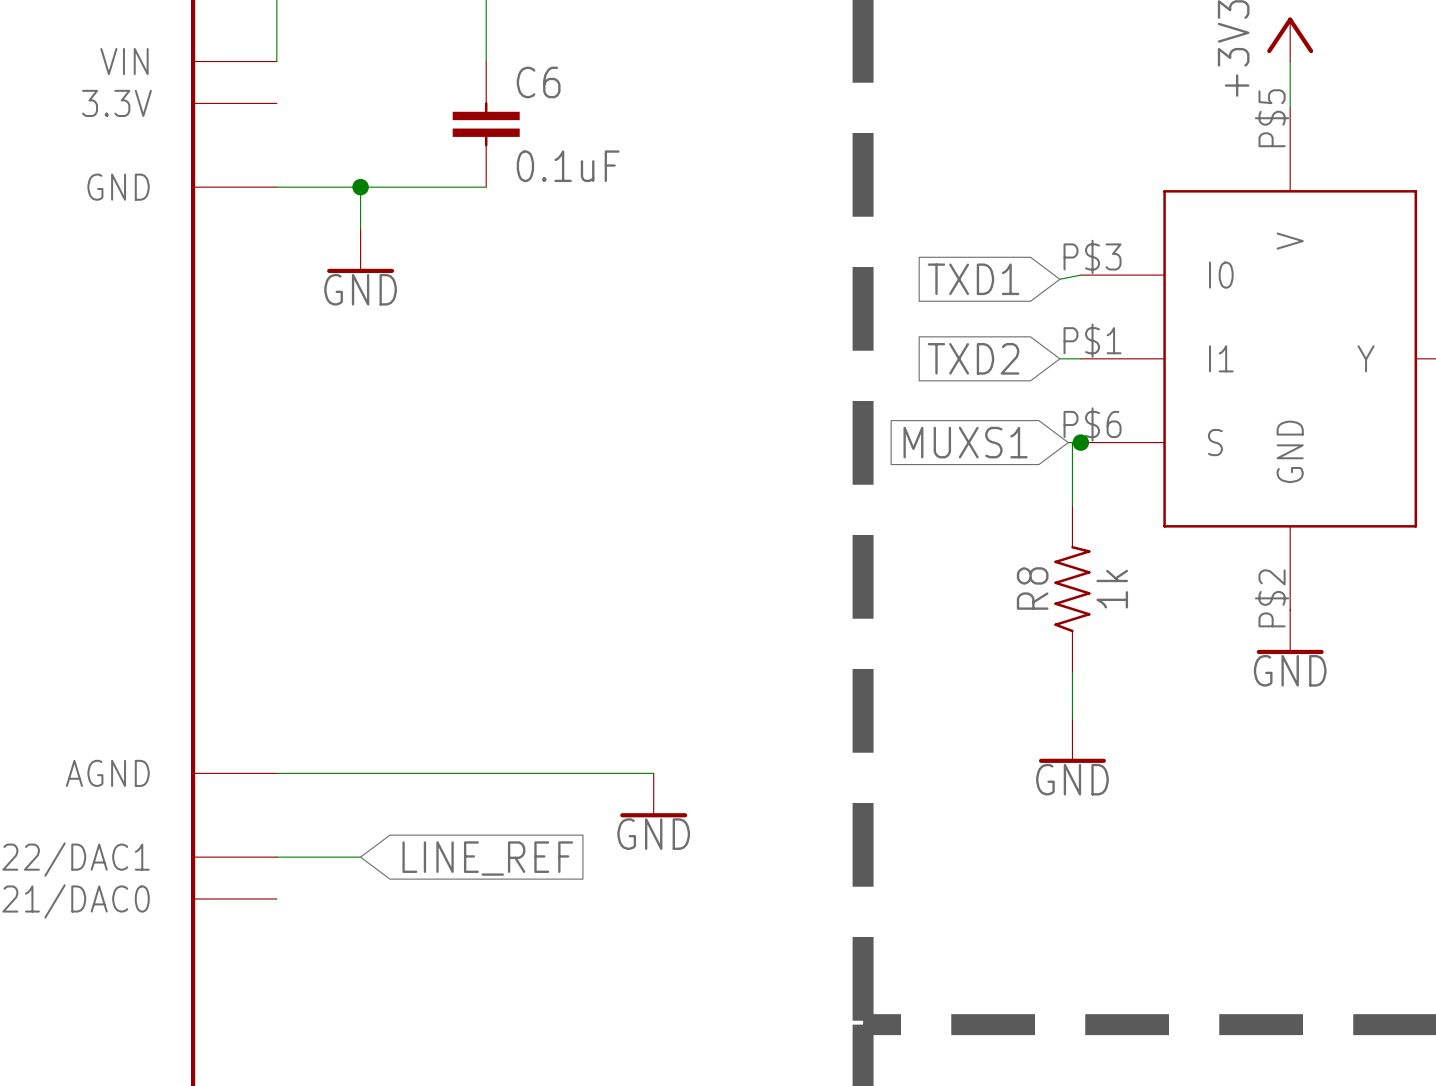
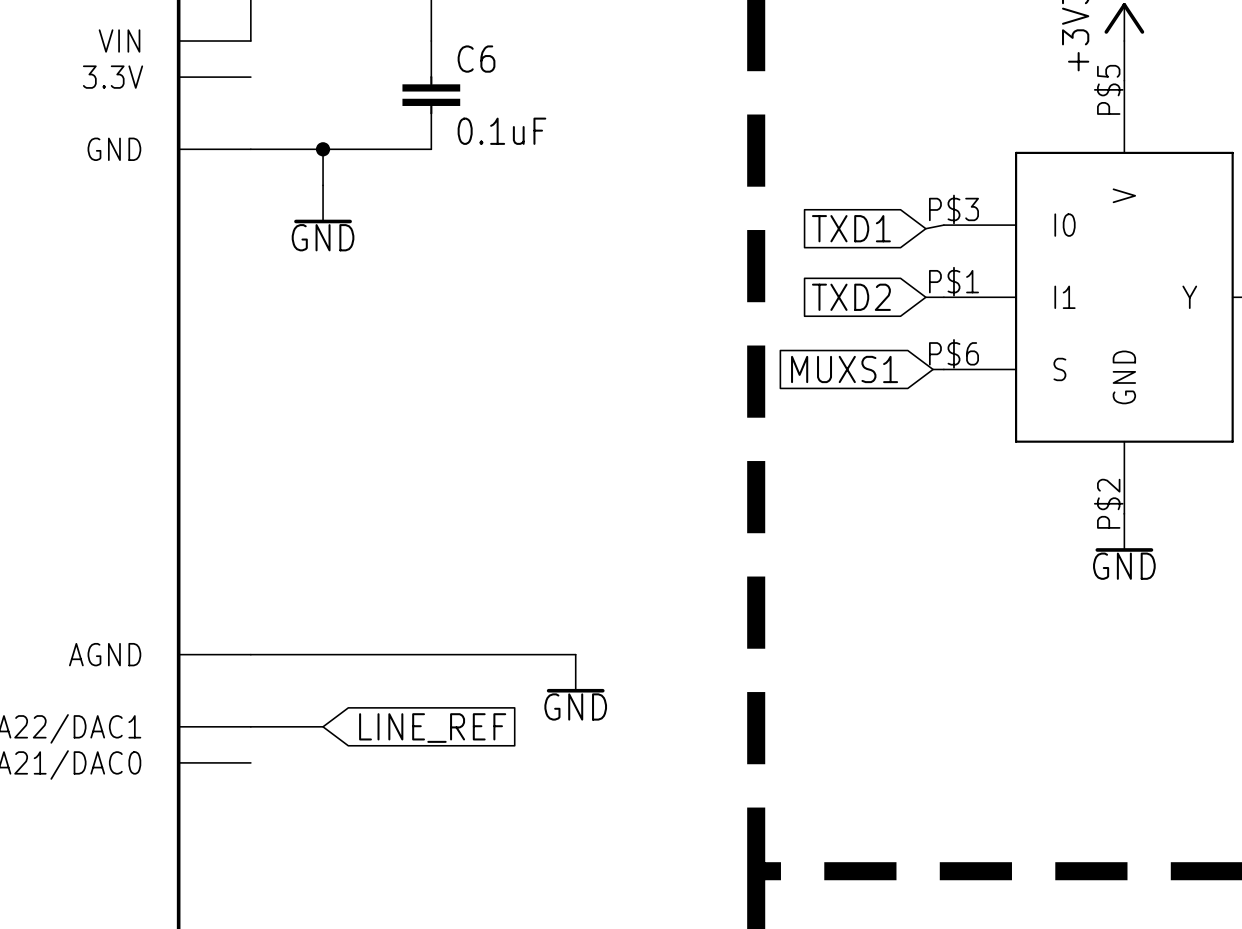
wire: (1072, 442) (1072, 505) -> none
junction: (1080, 442) -> none
R8: 1k (1072, 589) -> none
wire: (1072, 672) (1072, 718) -> none
power symbol: GND (1072, 740) -> none

